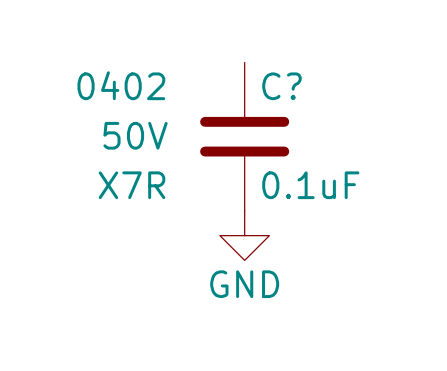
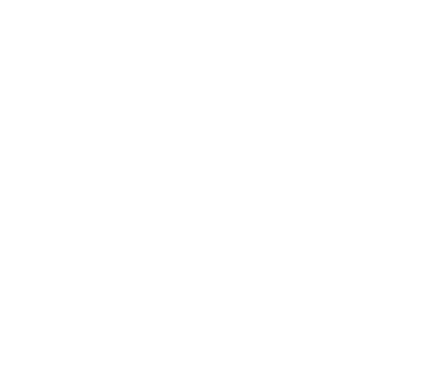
C?: 0.1uF (244, 136) -> none
power symbol: GND (244, 235) -> none

